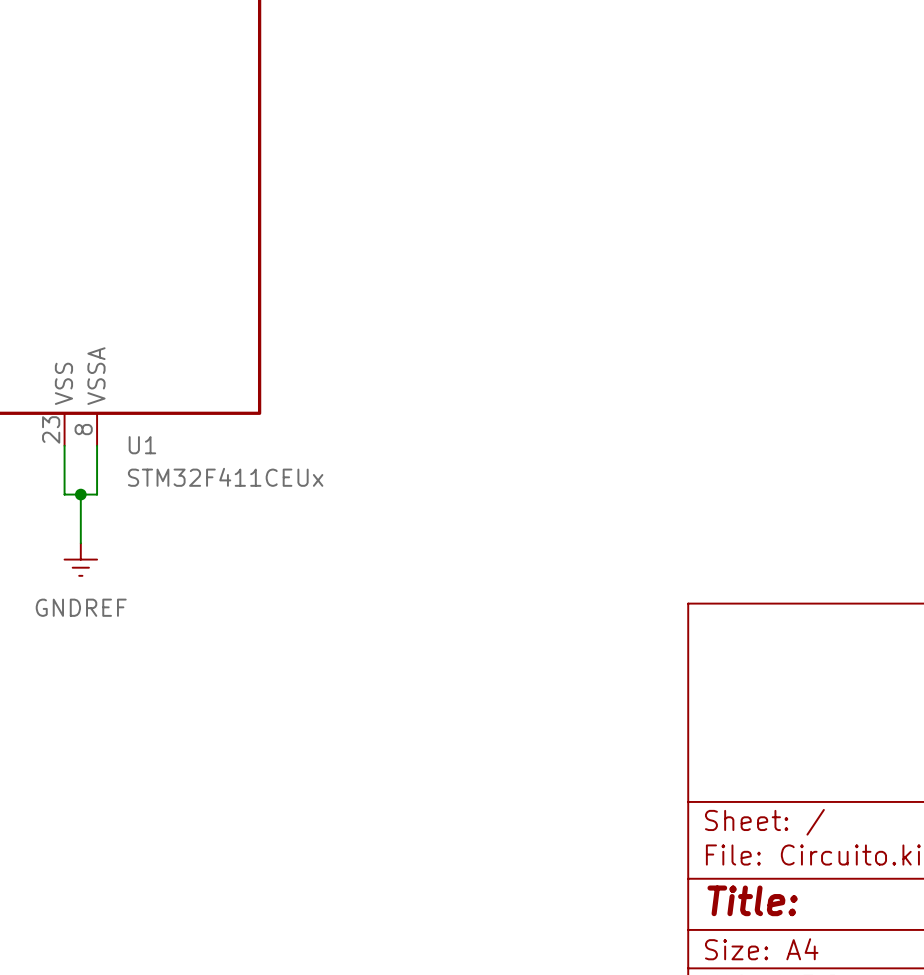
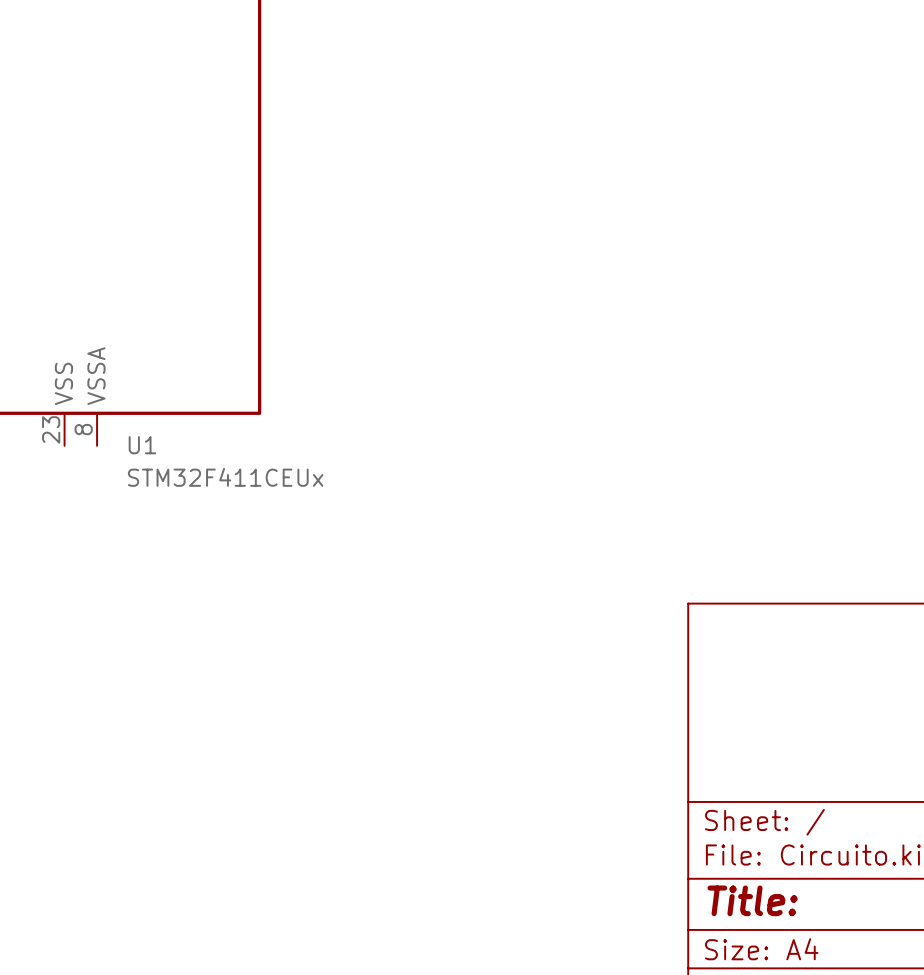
wire: (64, 445) (64, 494) (97, 494) (97, 445) -> none
wire: (80, 494) (80, 543) -> none
junction: (80, 494) -> none
power symbol: GNDREF (80, 559) -> none

